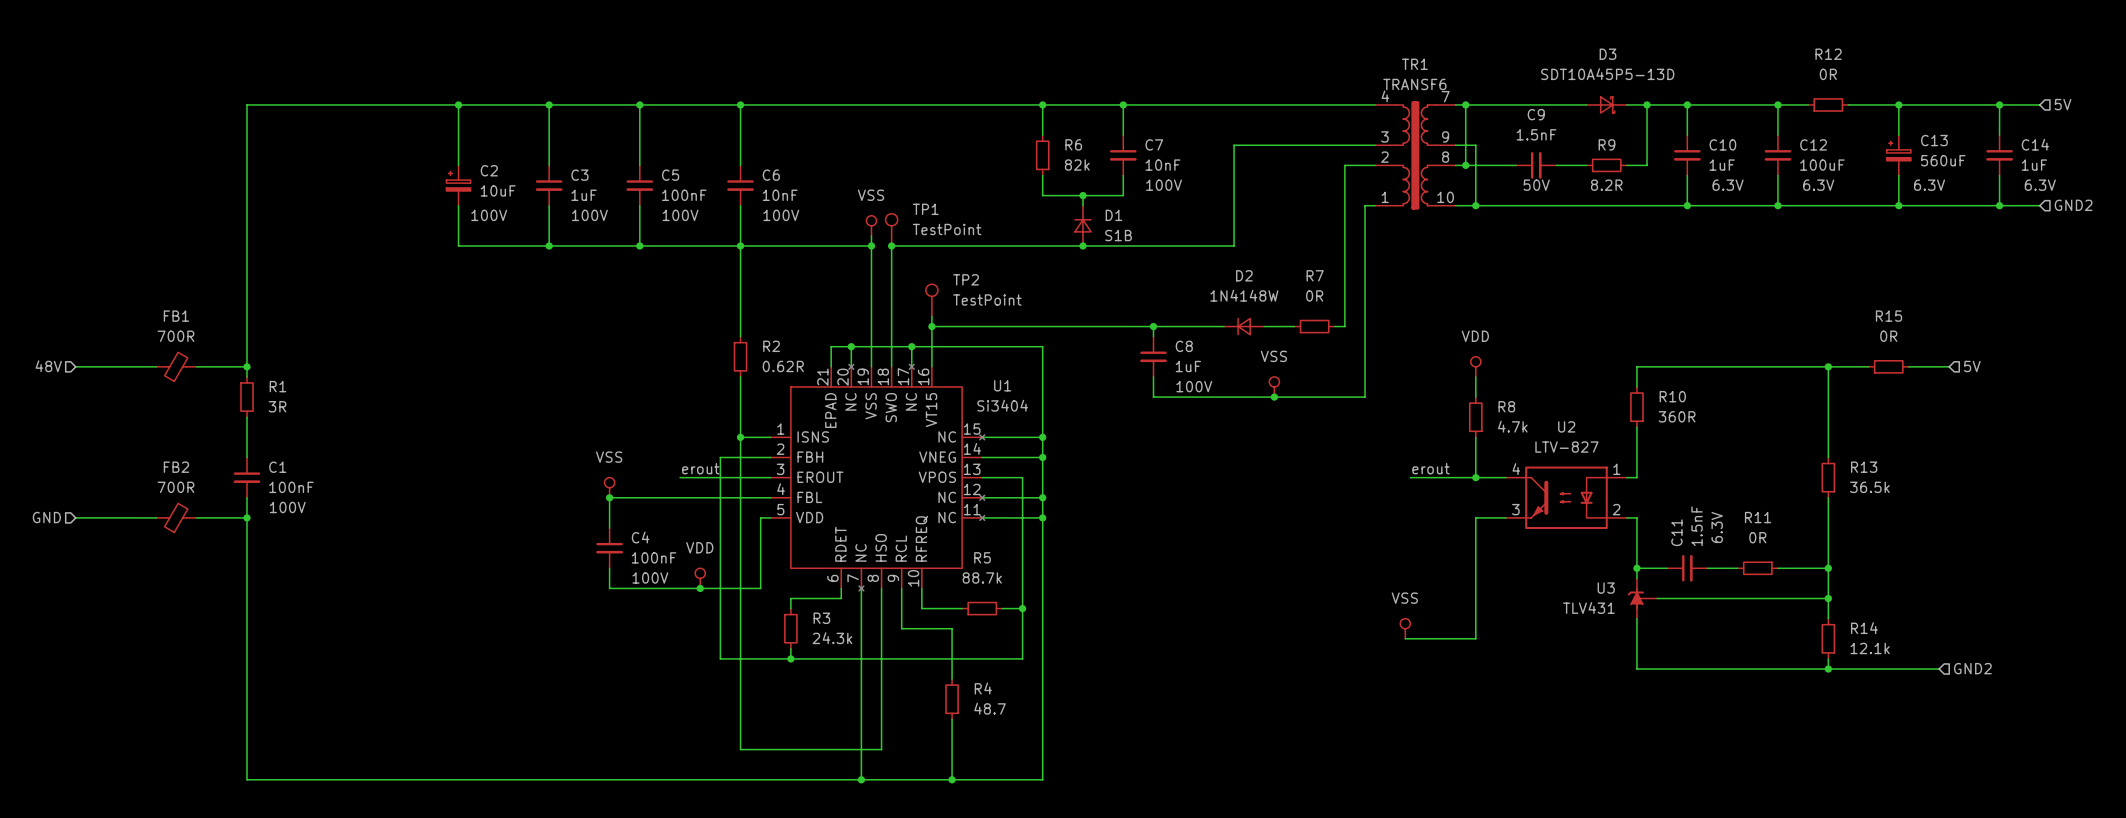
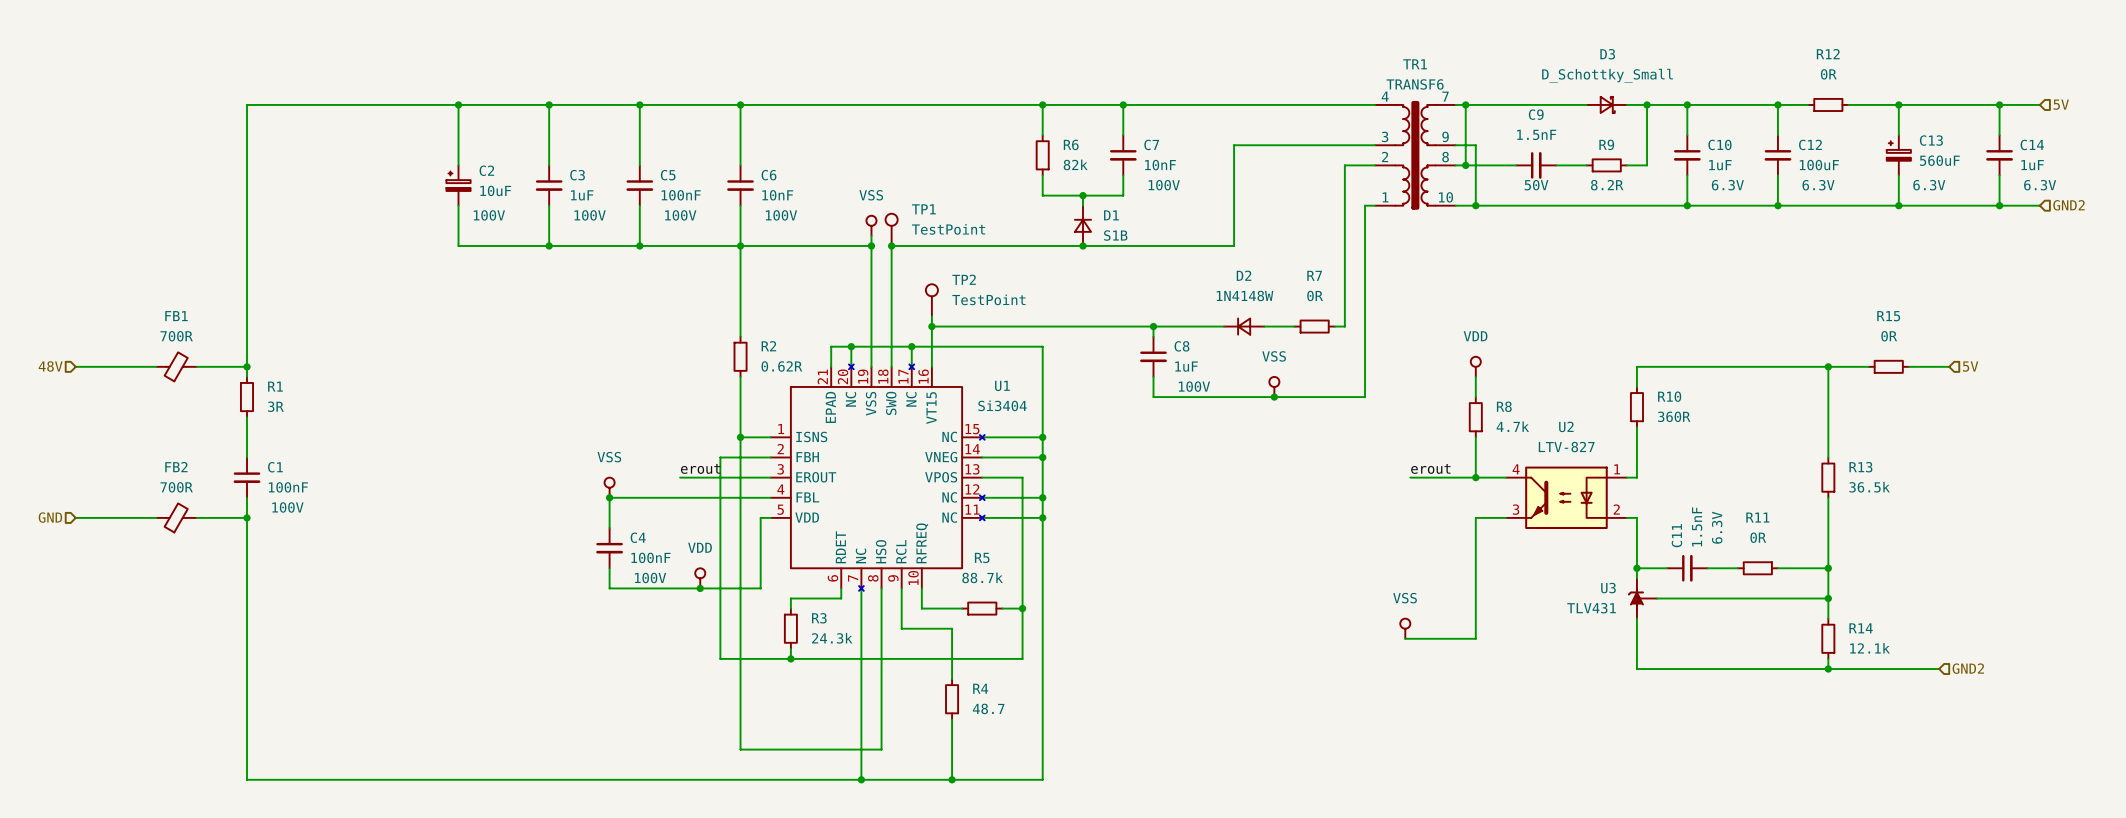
D3 value: SDT10A45P5-13D (1607, 74) -> D_Schottky_Small (1607, 75)

